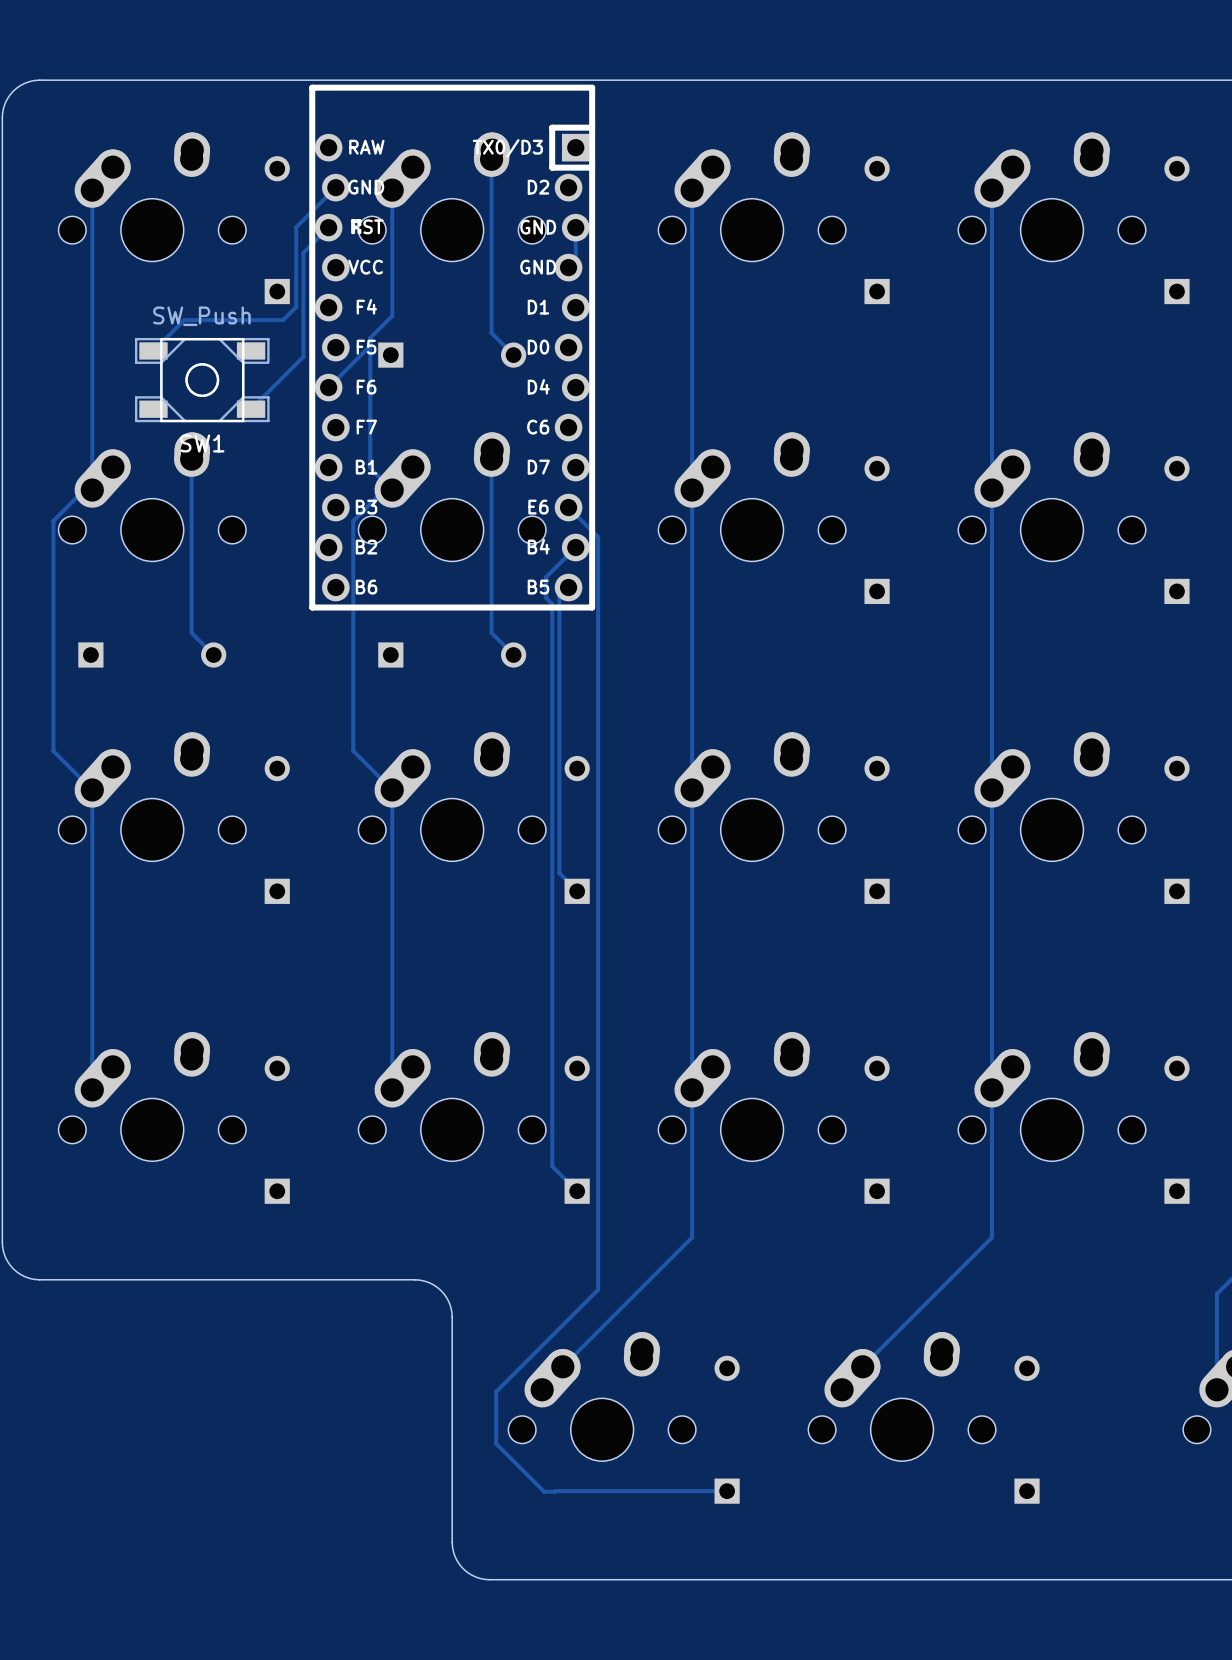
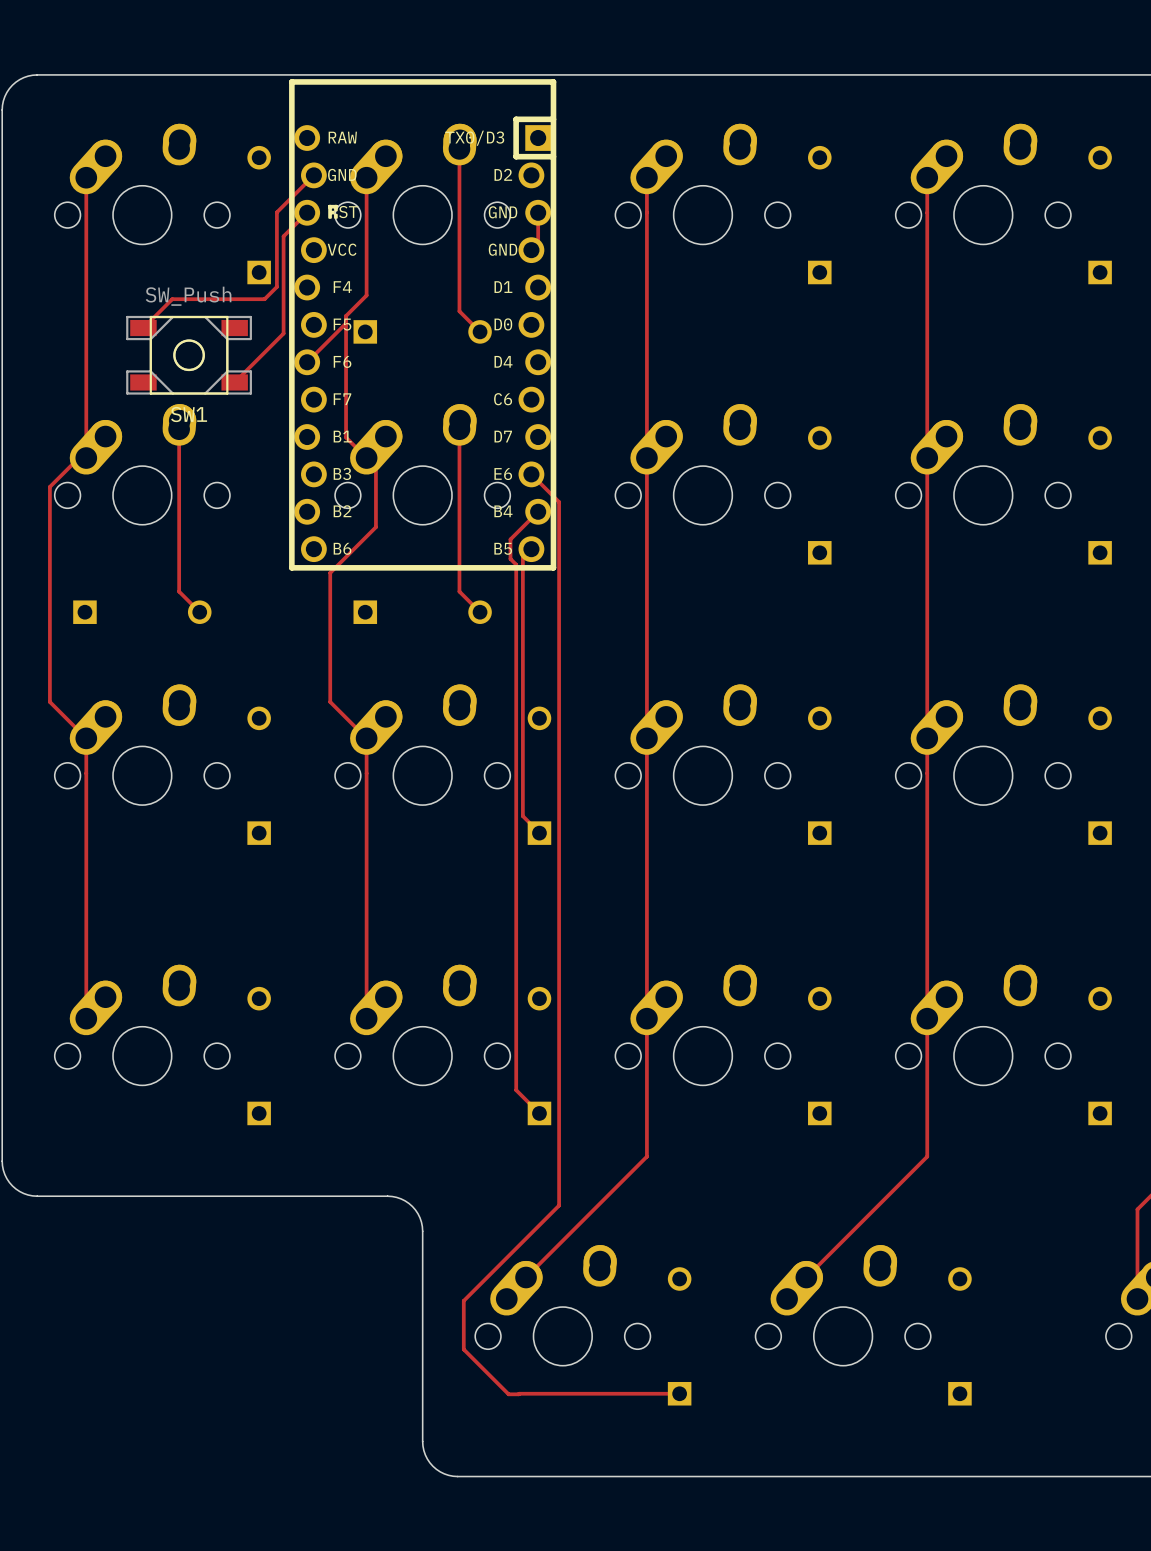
track: (384, 490) (353, 520) (353, 612) -> (366, 458) (375, 467) (375, 527) (330, 572)

